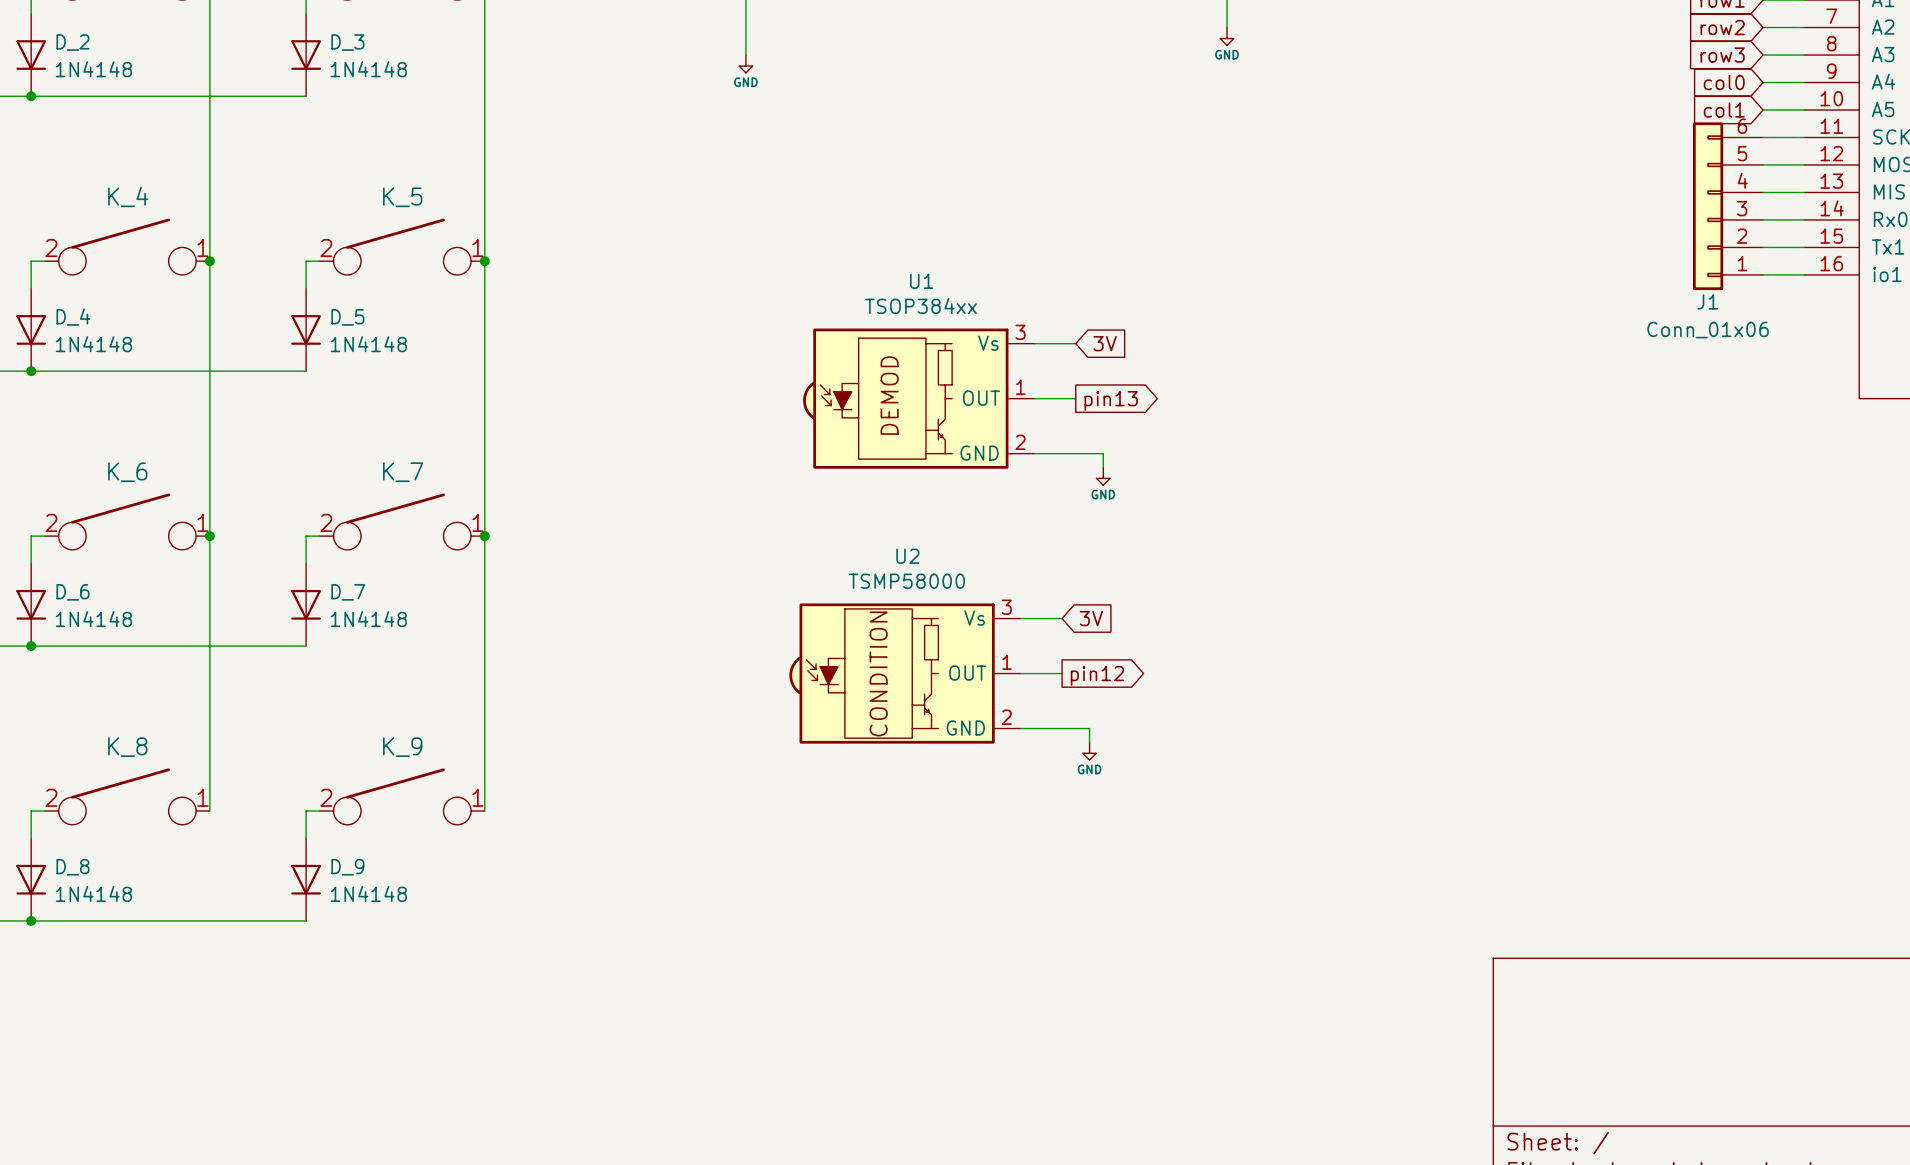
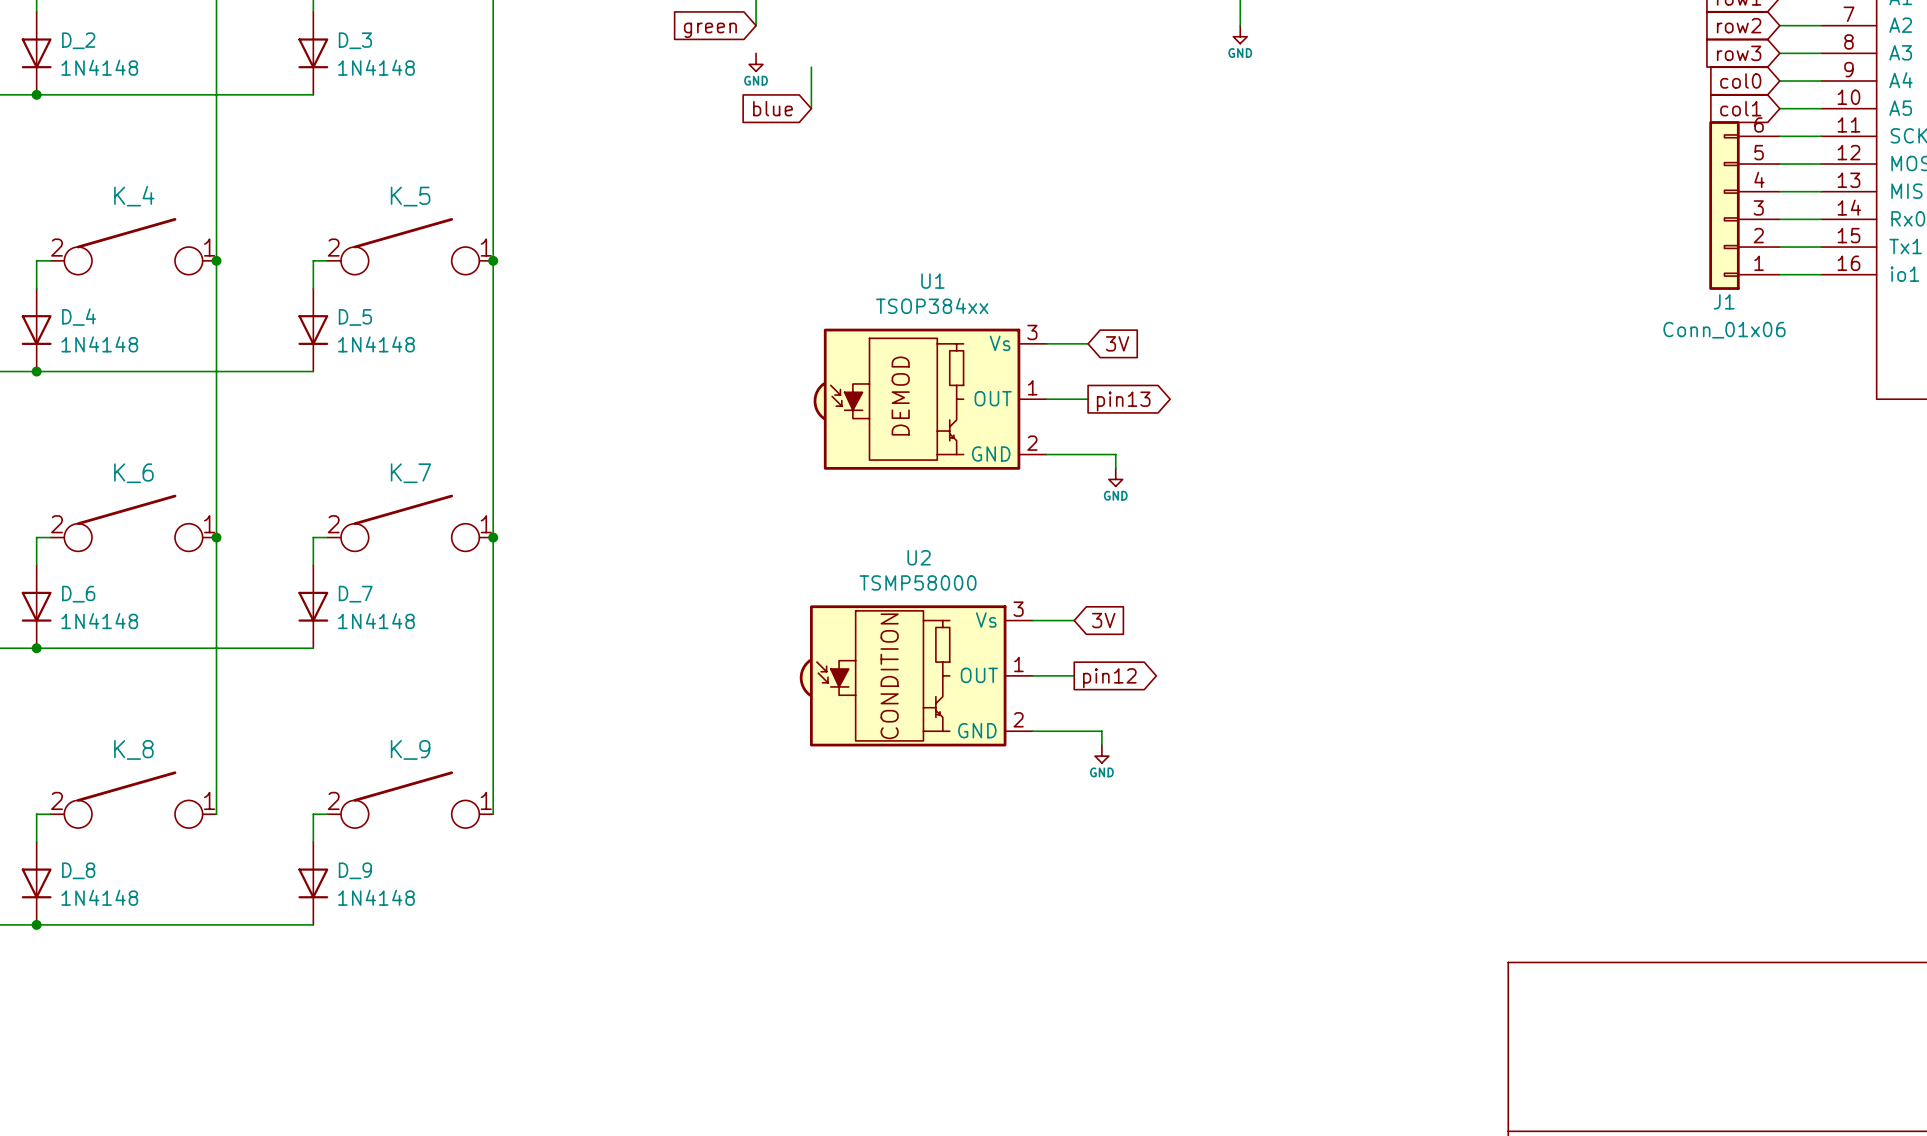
wire: (745, 27) (745, 55) -> none
global label: none -> green (710, 30)
wire: none -> (811, 67) (811, 108)
global label: none -> blue (772, 108)

